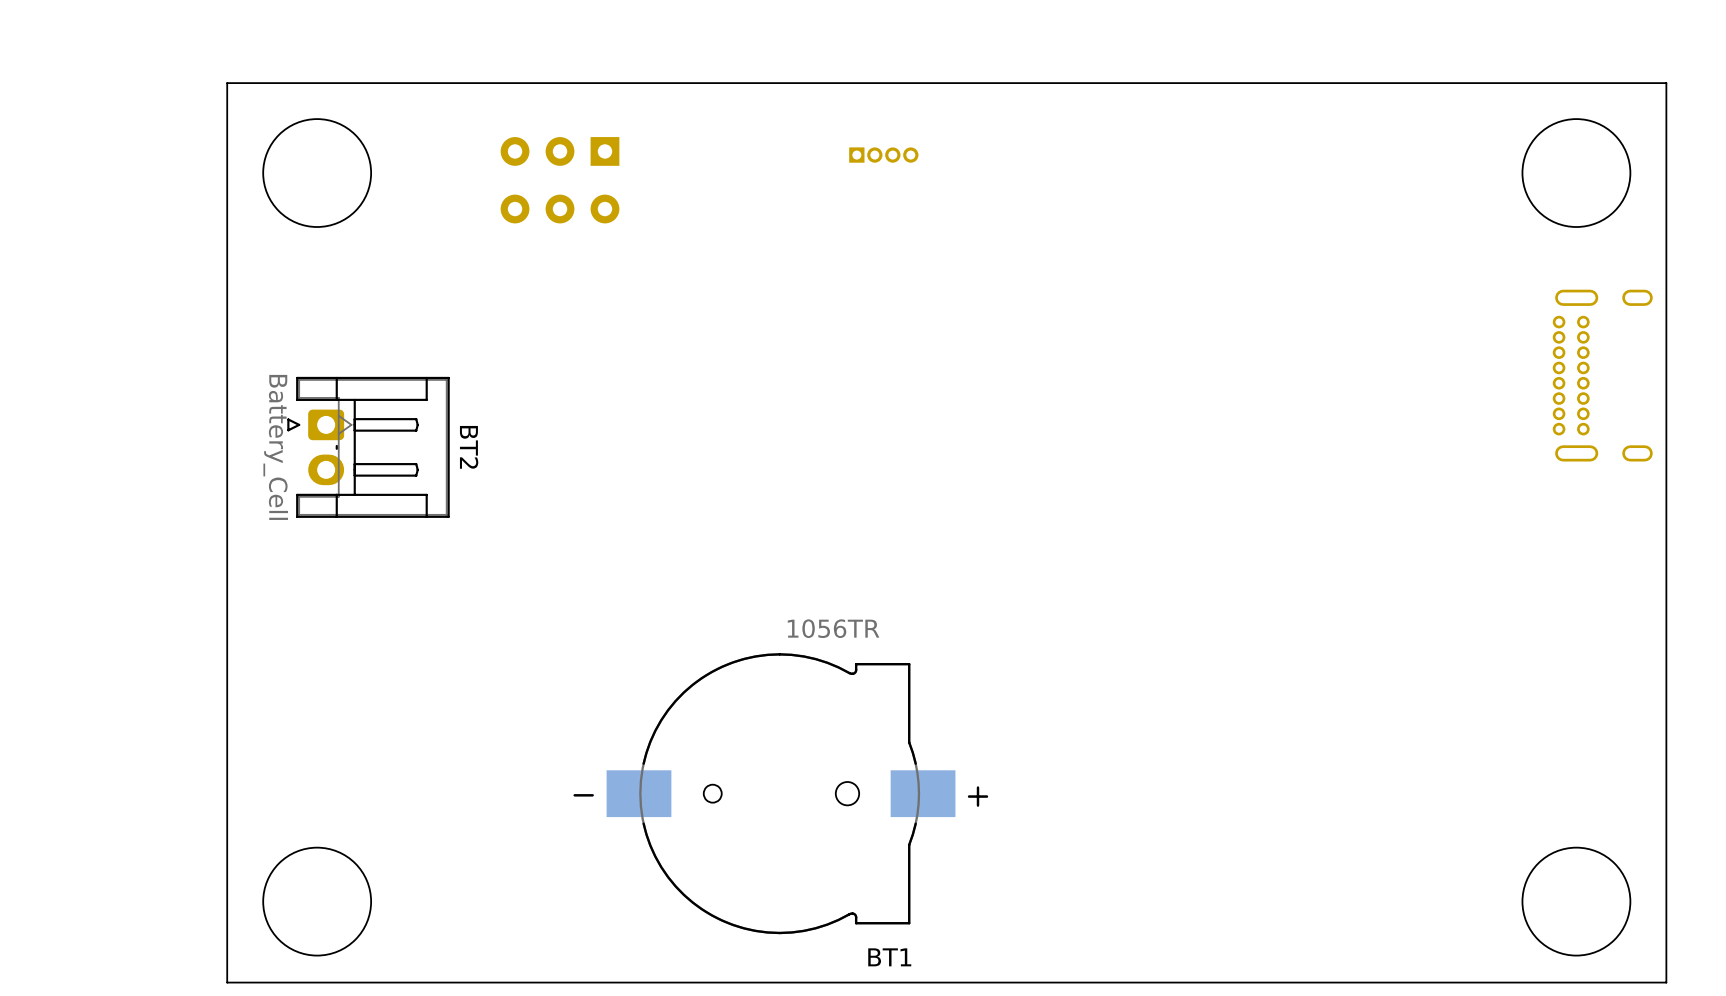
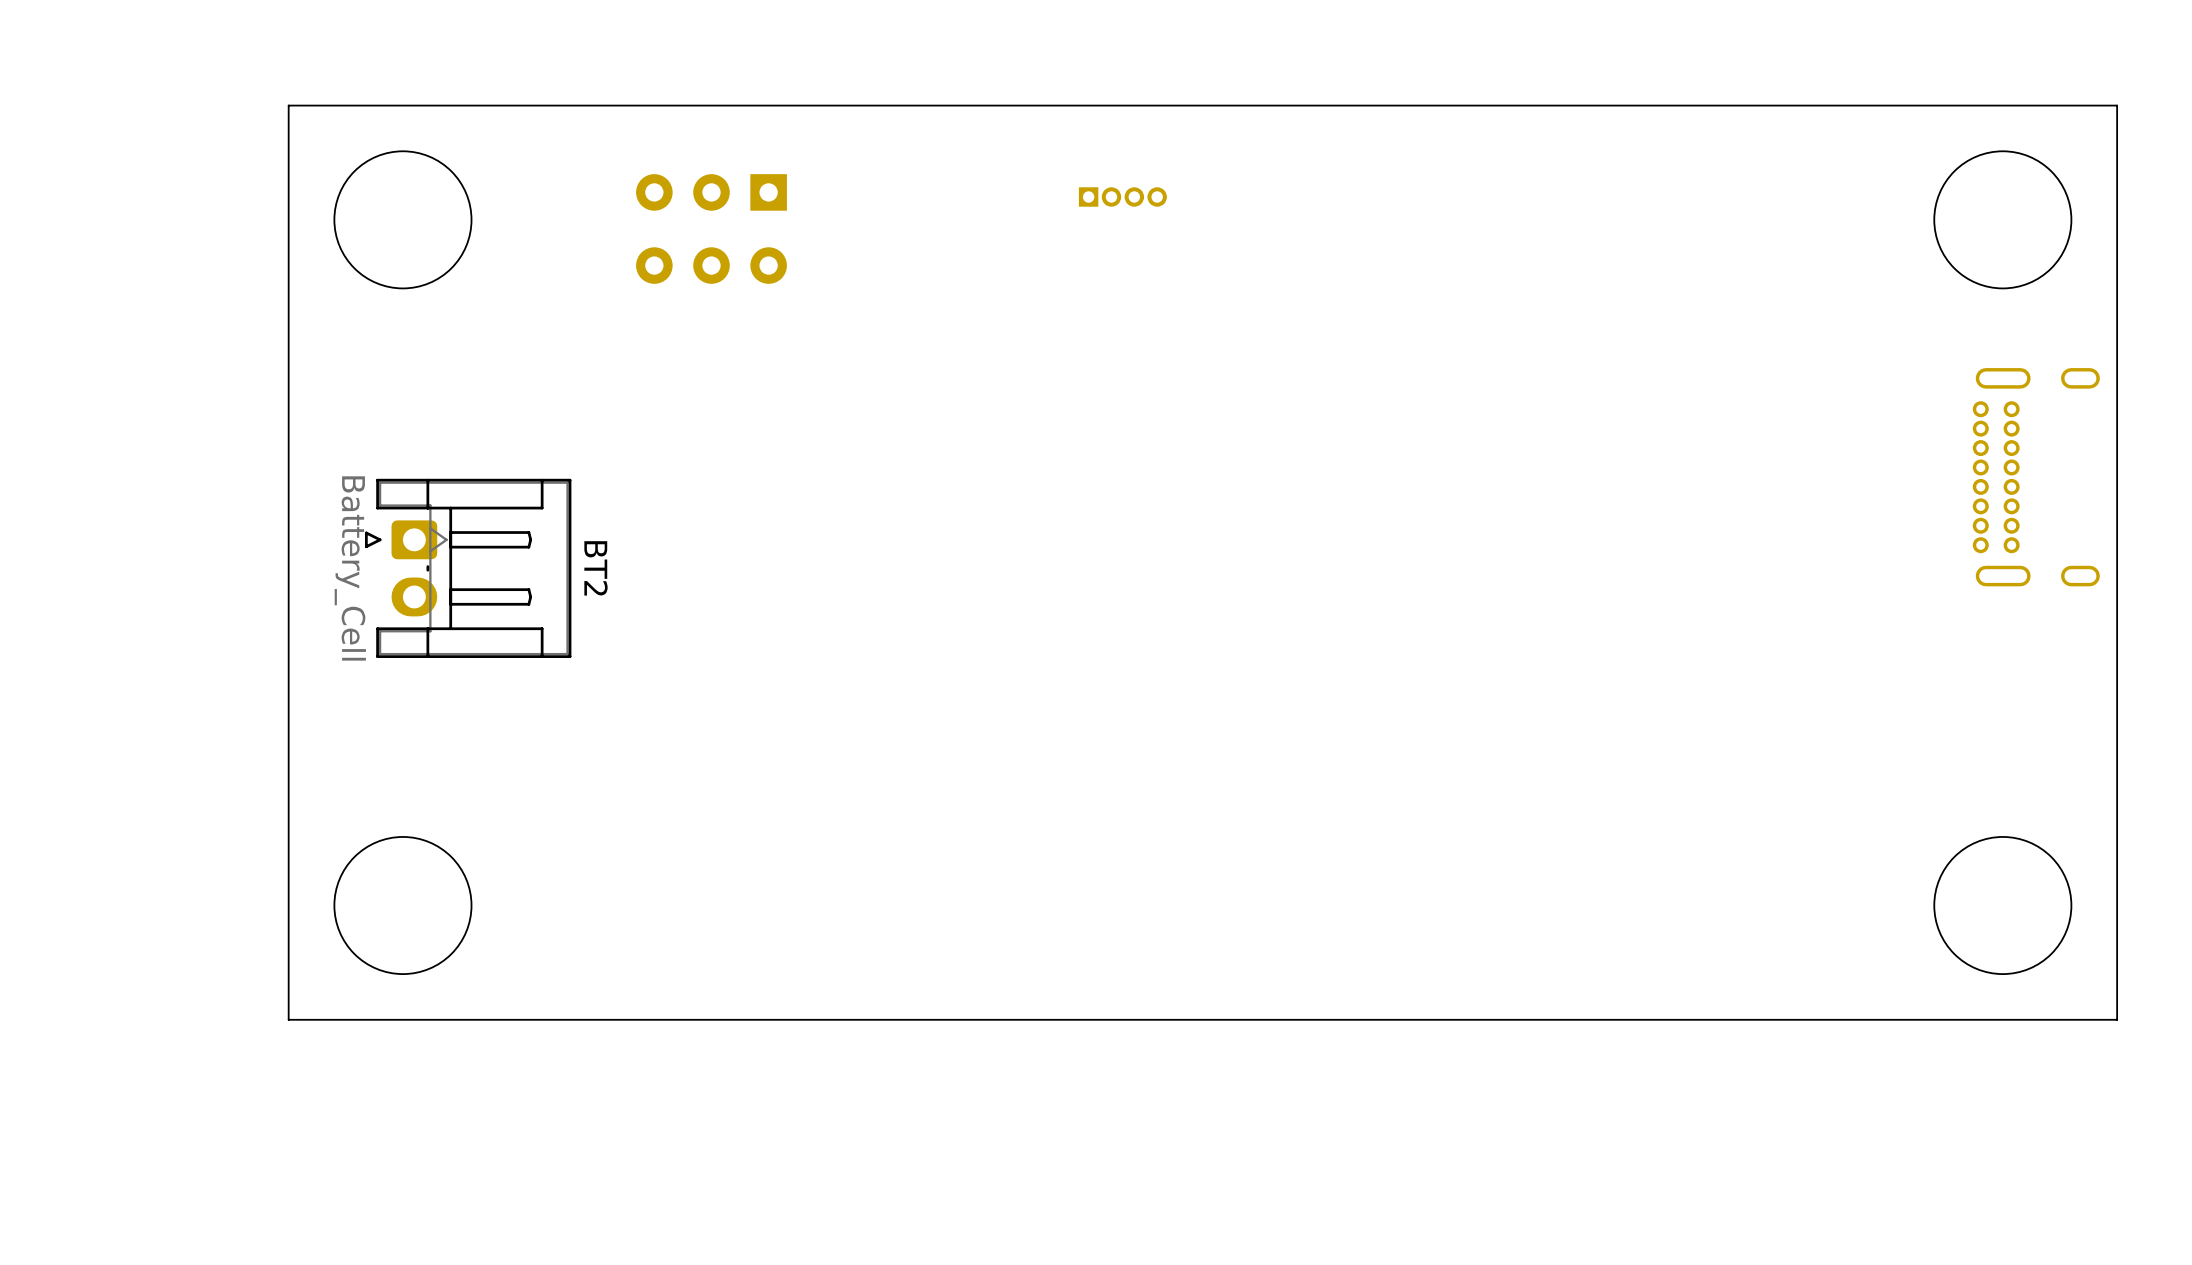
BT1: 1056TR (780, 793) -> none
board edge: (1666, 802) (1666, 982) (227, 982) (227, 802) -> (2117, 1019) (288, 1019)
round board edge position: (317, 901) -> (402, 905)
round board edge position: (1576, 901) -> (2002, 905)

